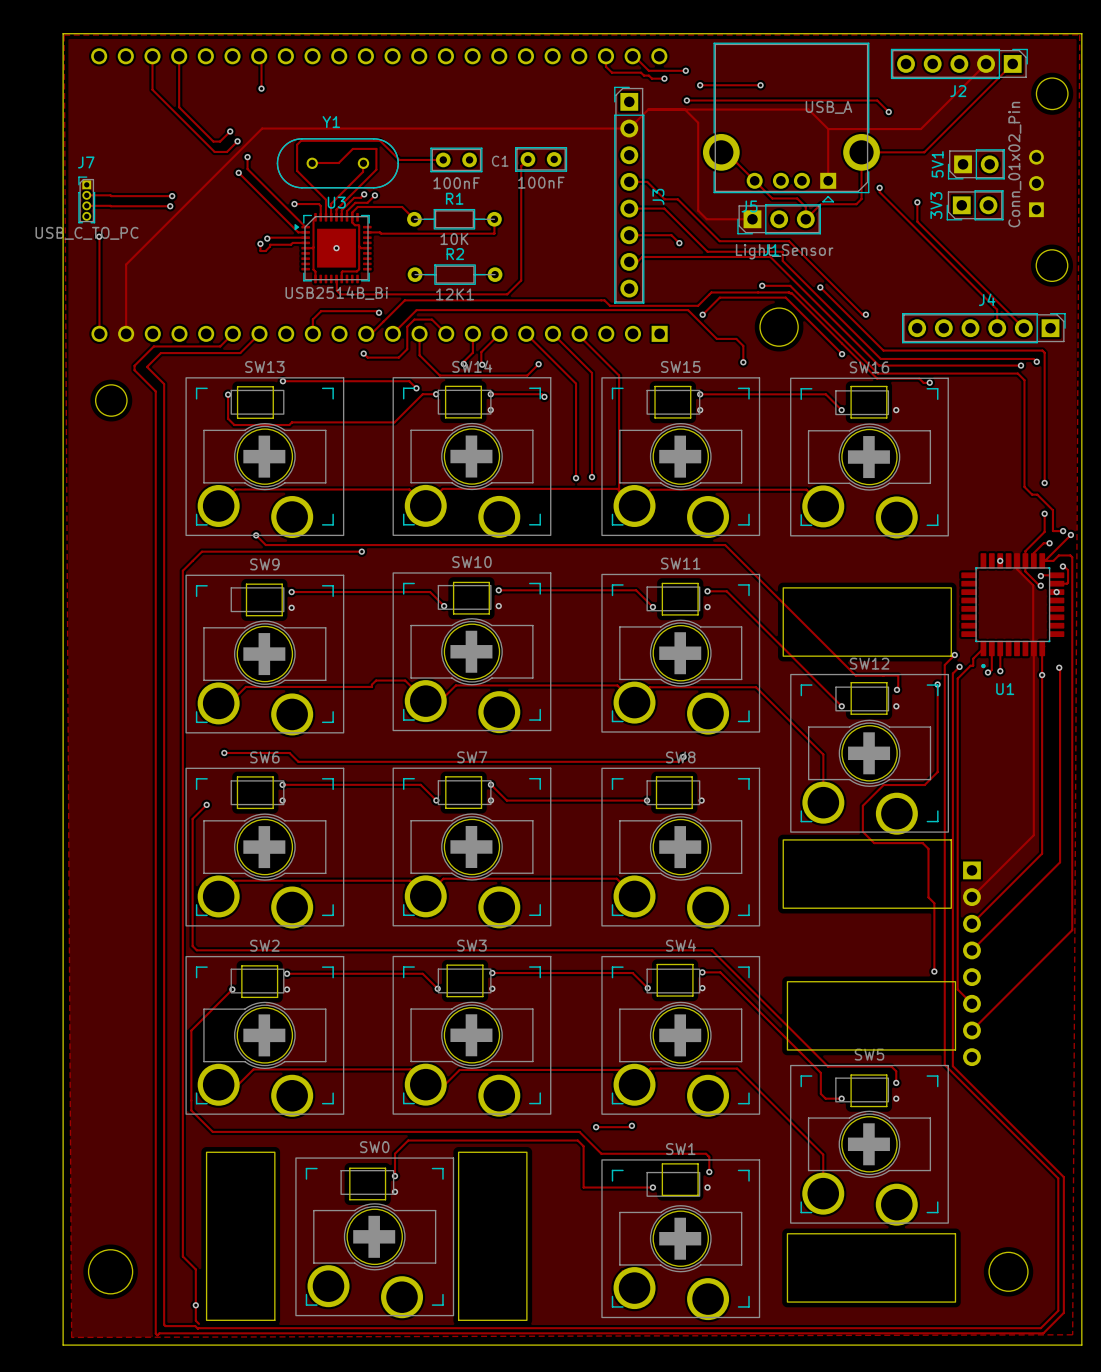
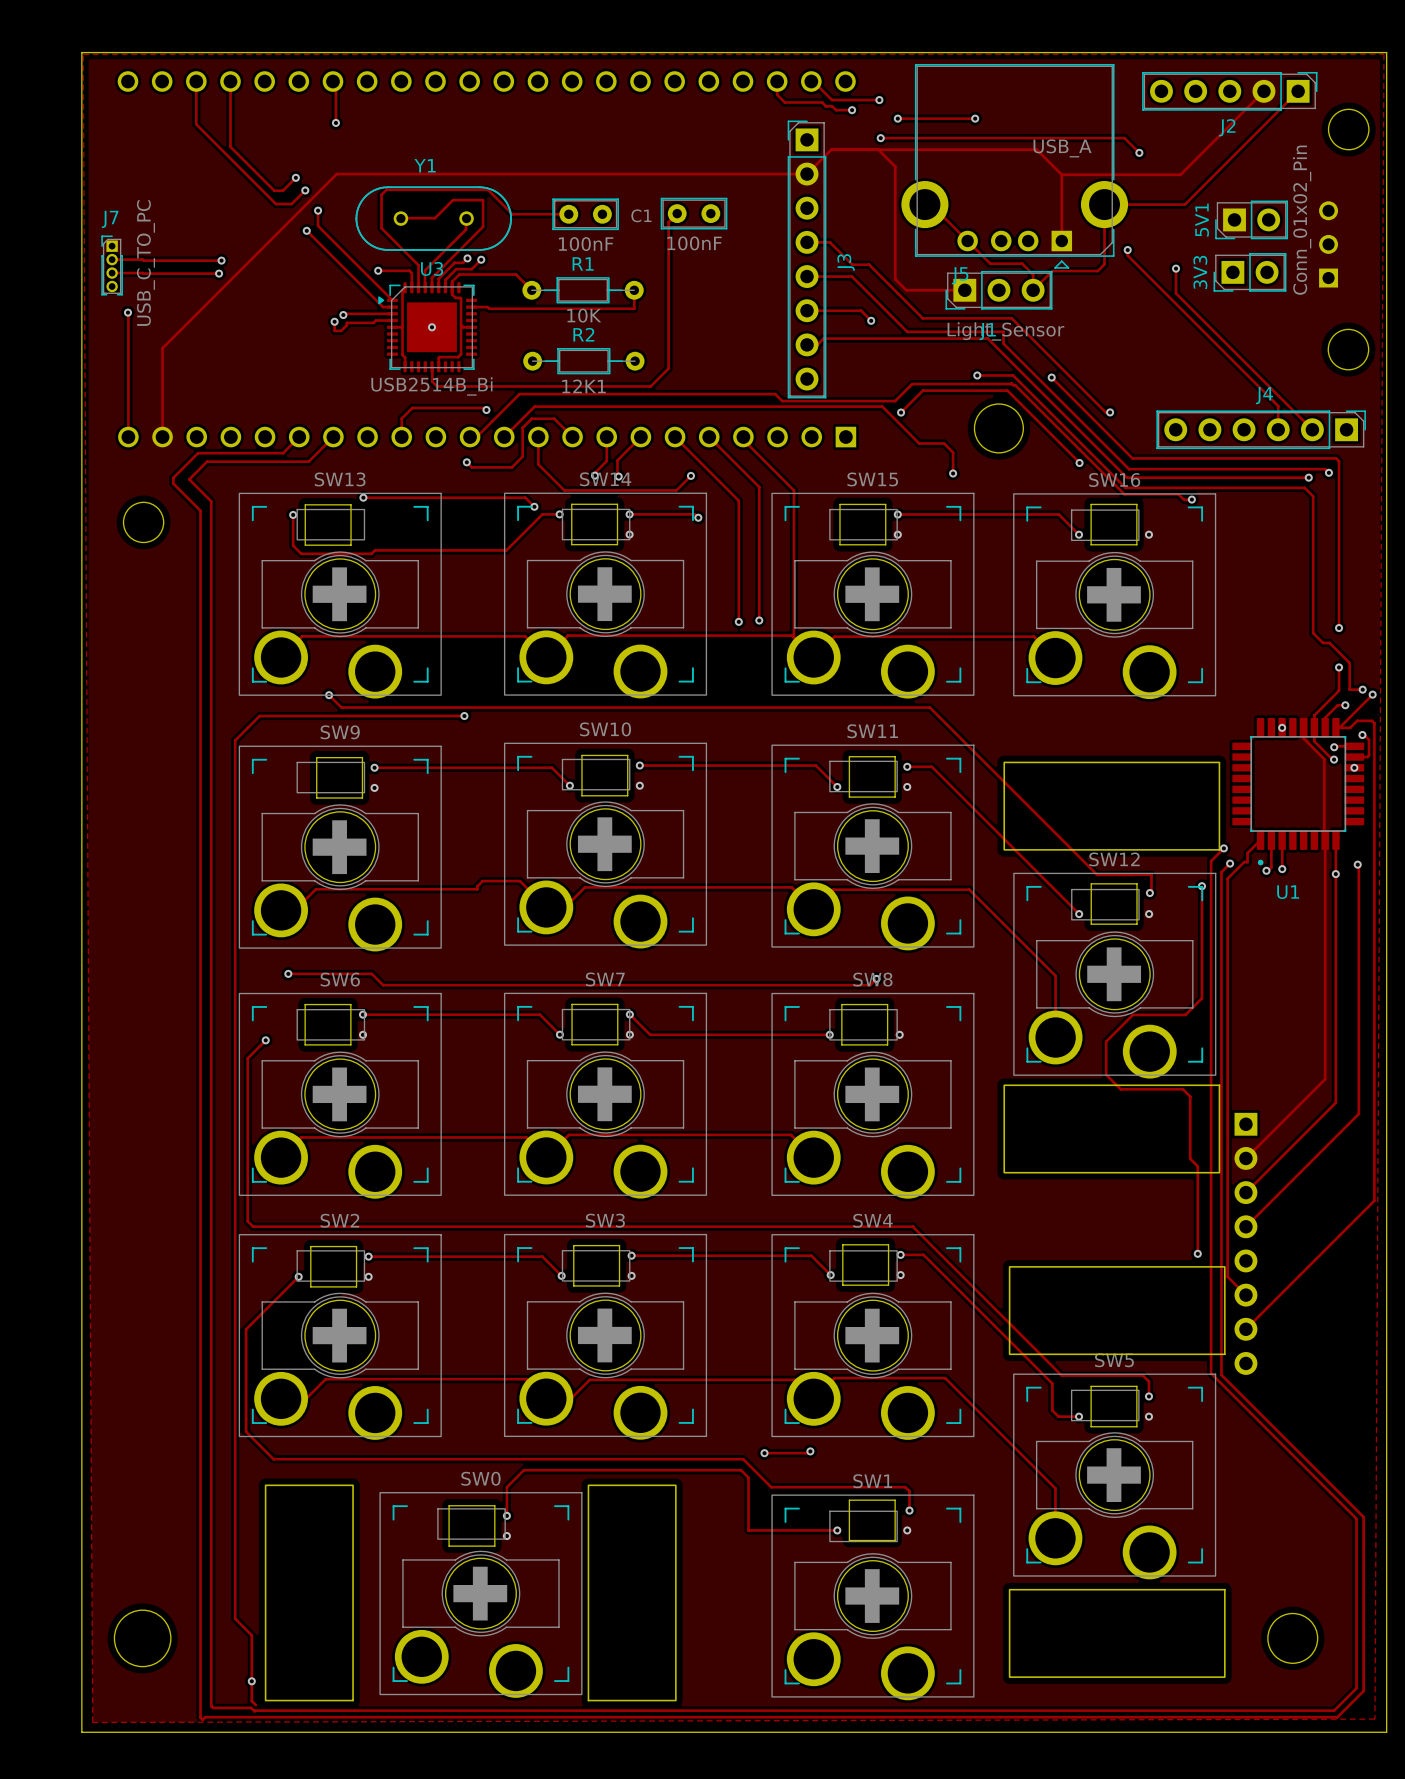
J7 value rotation: 0° (87, 233) -> 90° counterclockwise (145, 263)

